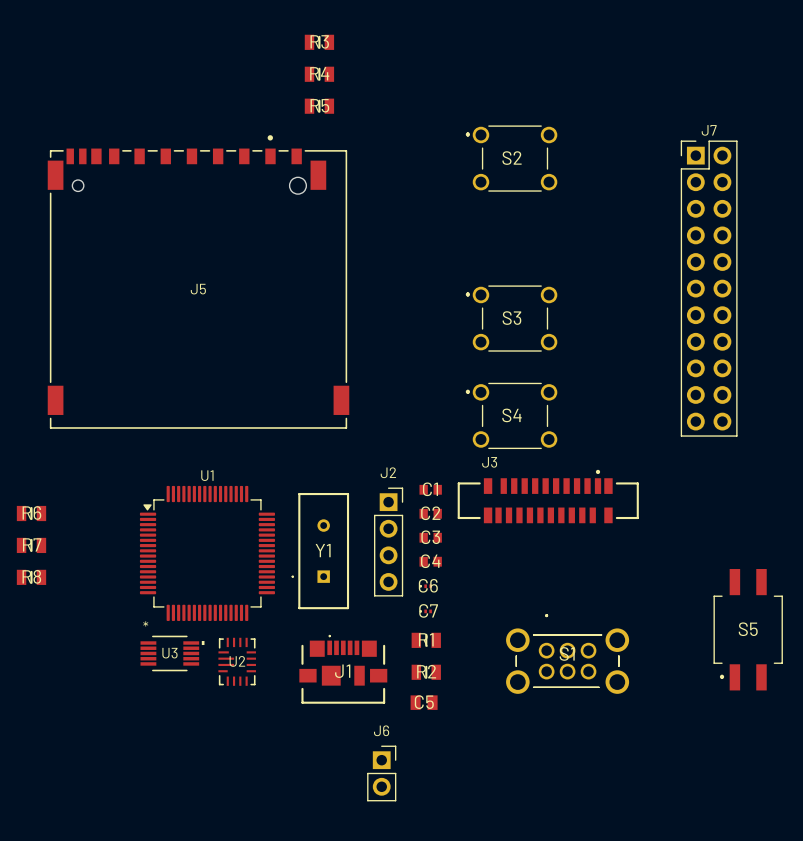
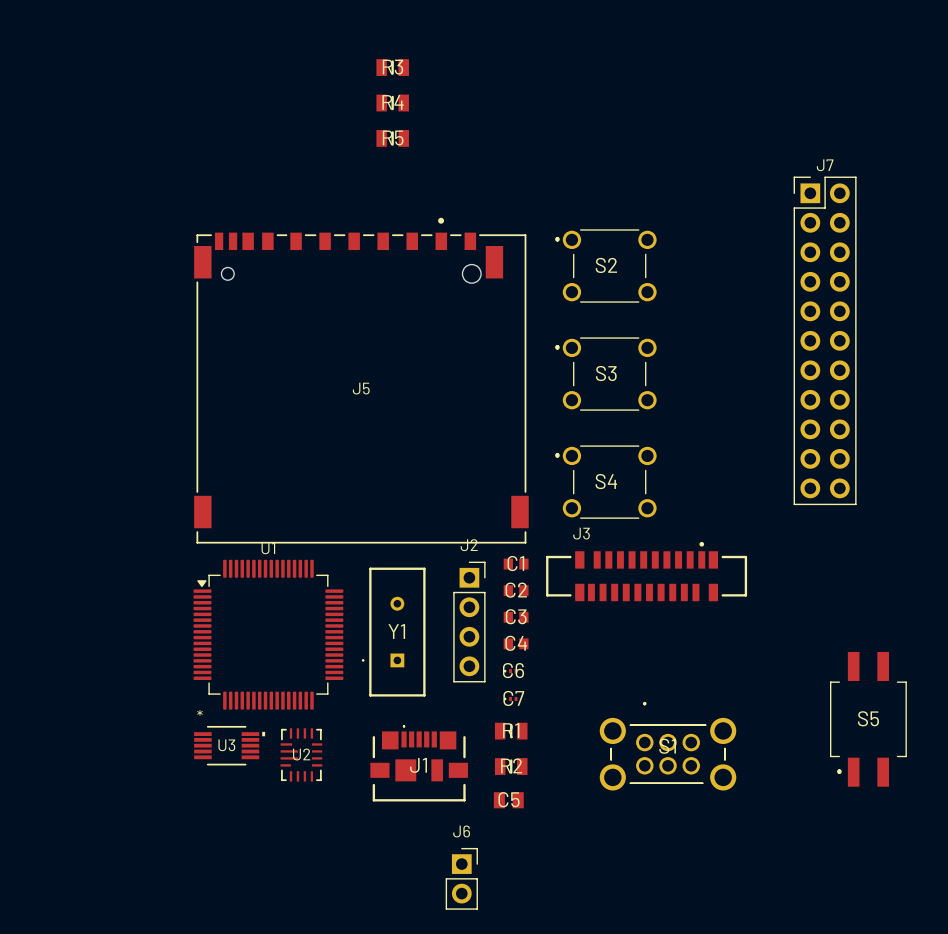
S2 position: (511, 158) -> (605, 266)
J5 position: (198, 281) -> (361, 380)
R6: (31, 513) -> none
R7: (31, 545) -> none
R8: (31, 577) -> none

